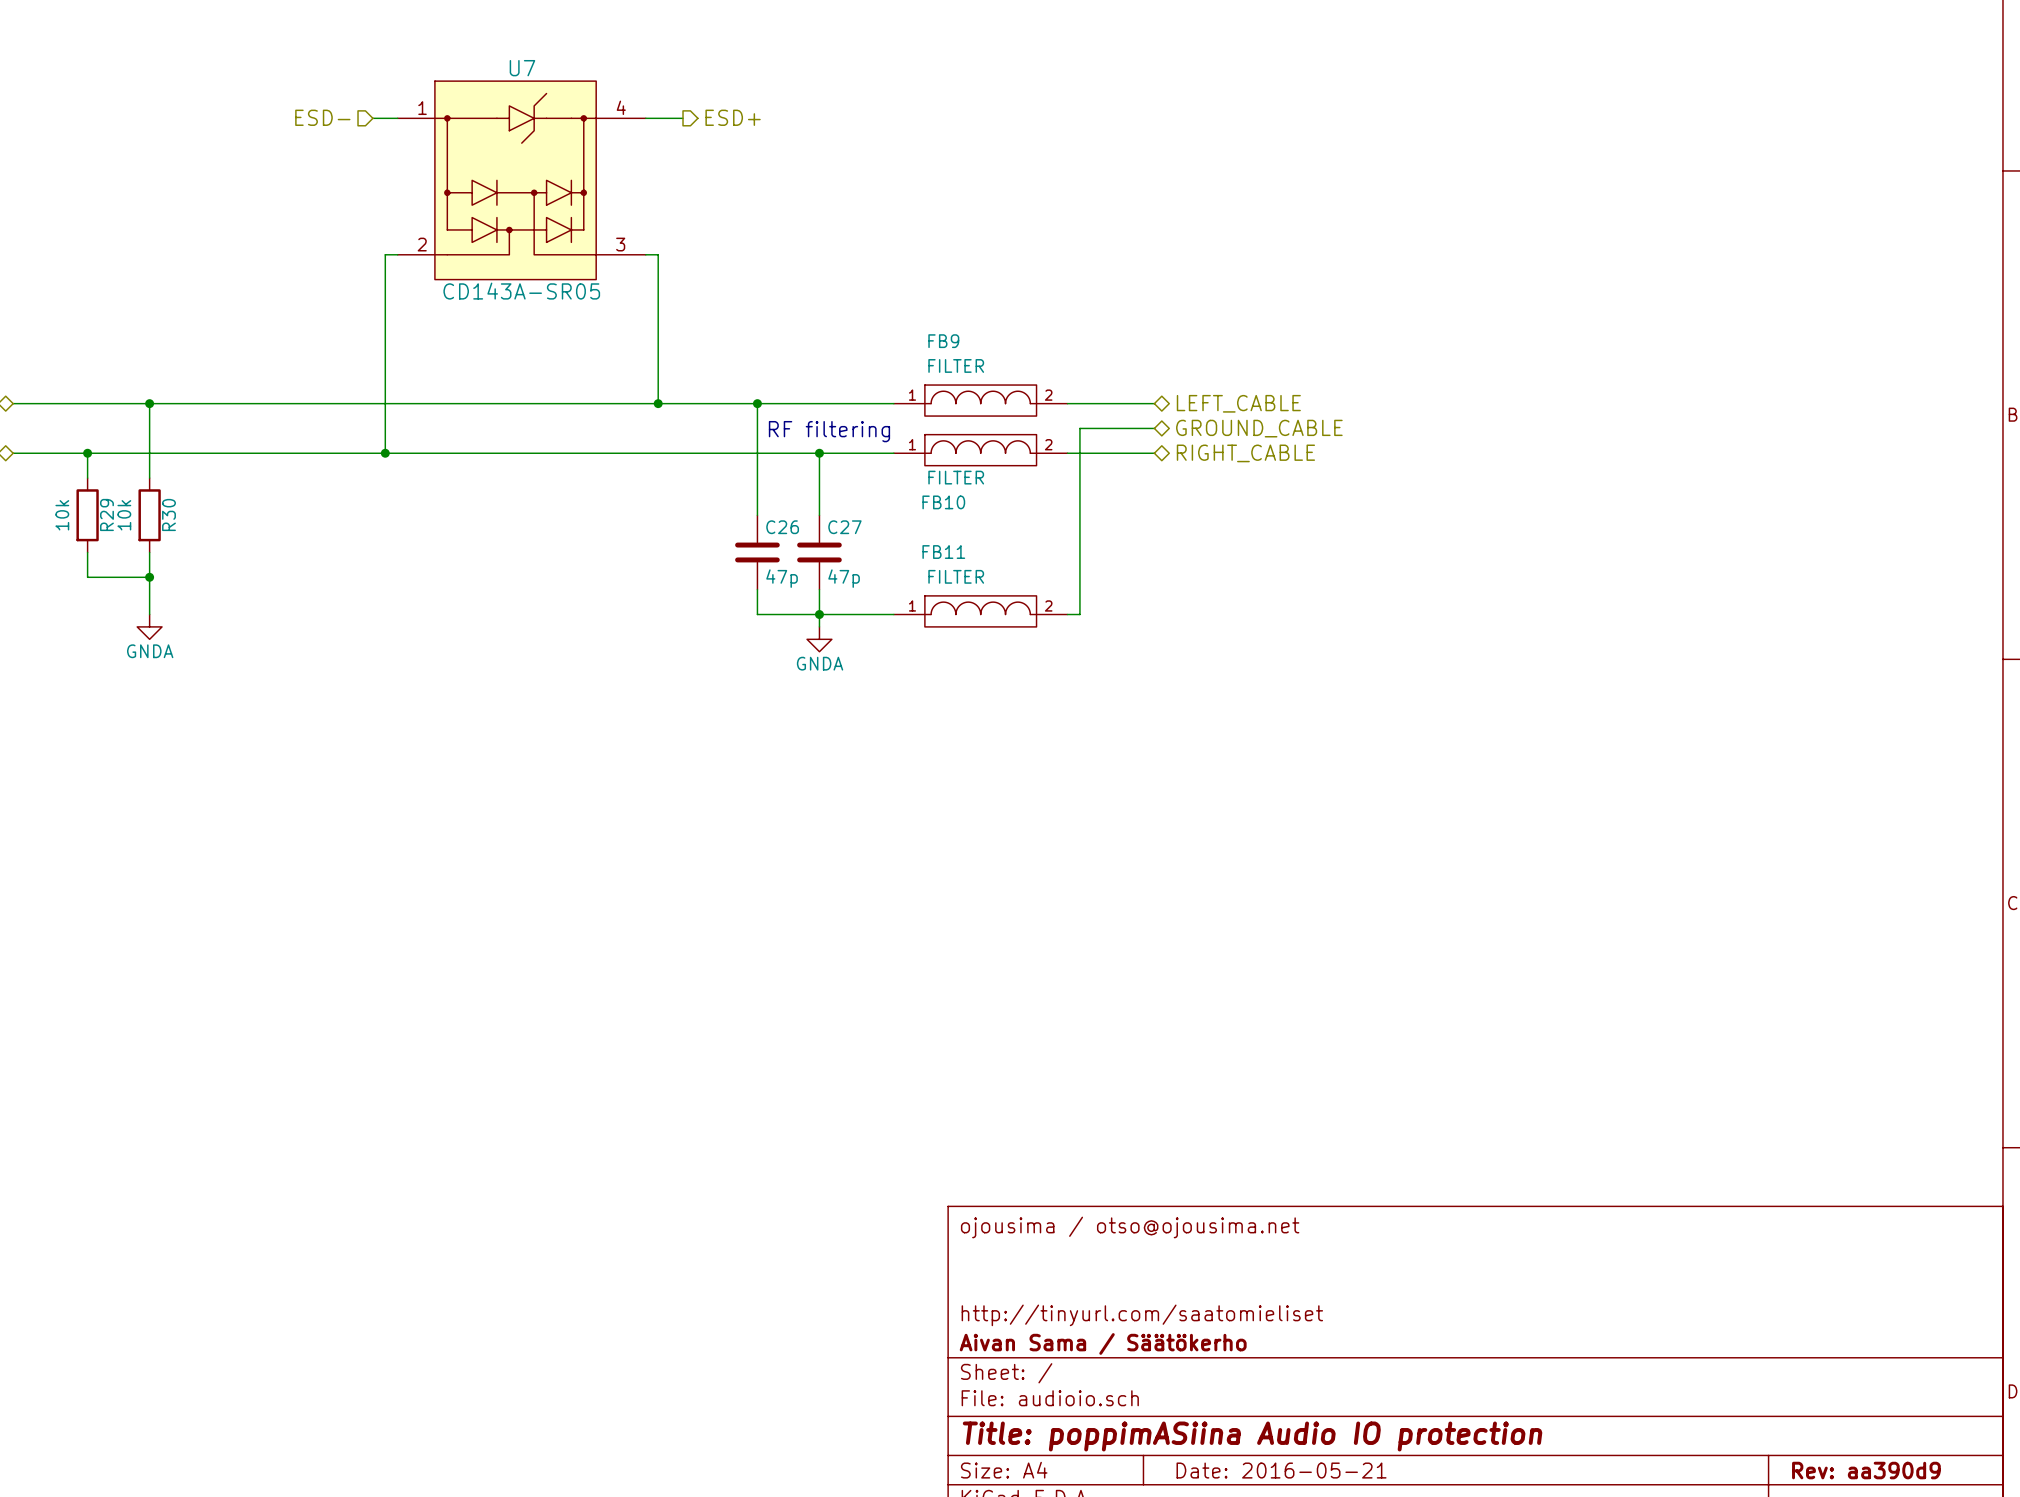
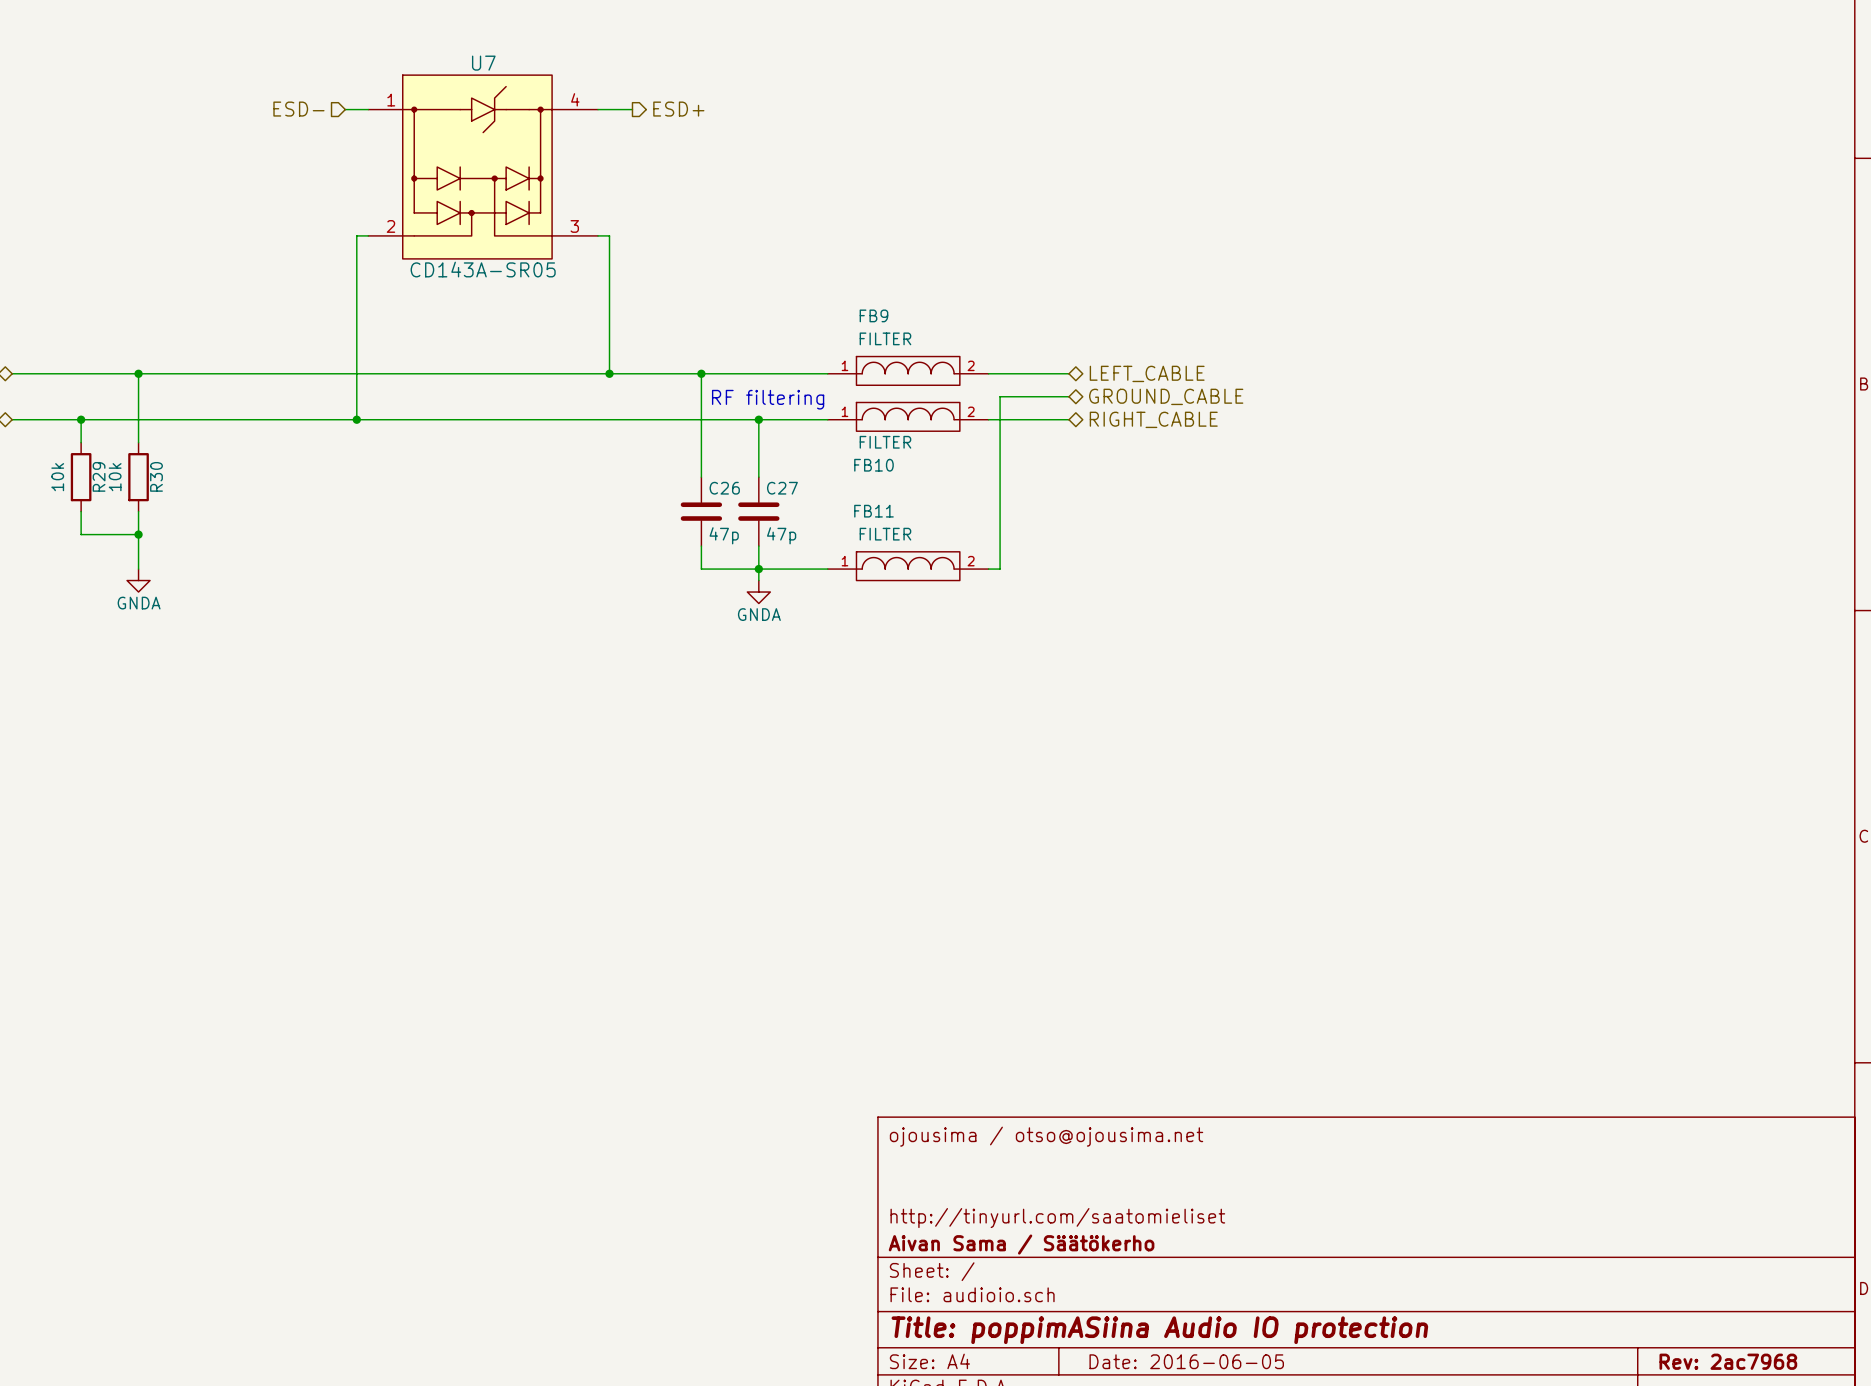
title block: Date: 2016-05-21 (1281, 1470) -> Date: 2016-06-05 (1186, 1361)
title block: Rev: aa390d9 (1866, 1470) -> Rev: 2ac7968 (1728, 1361)

